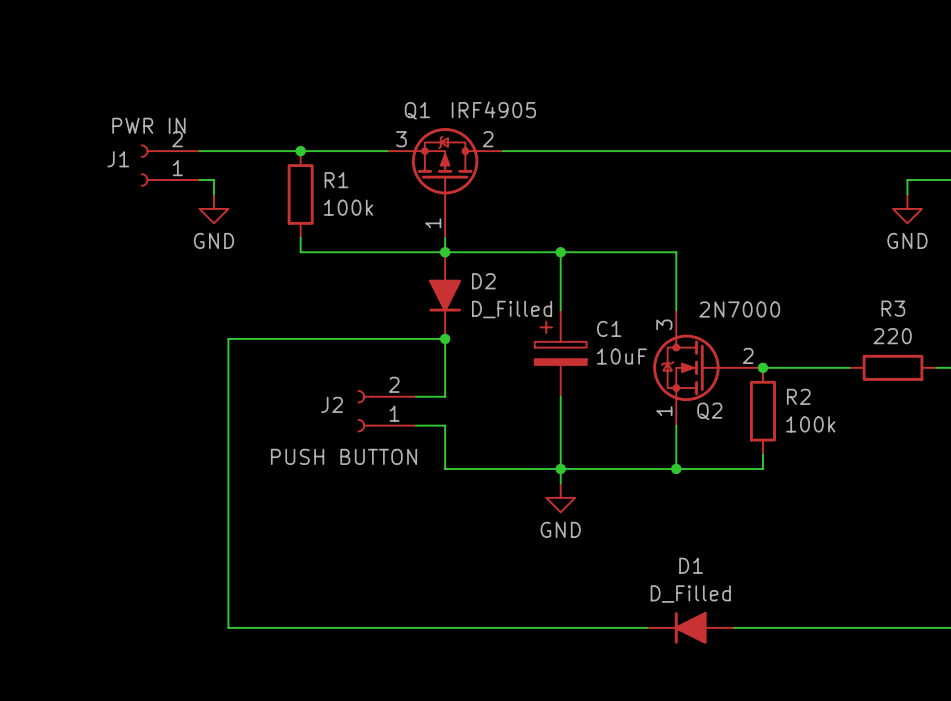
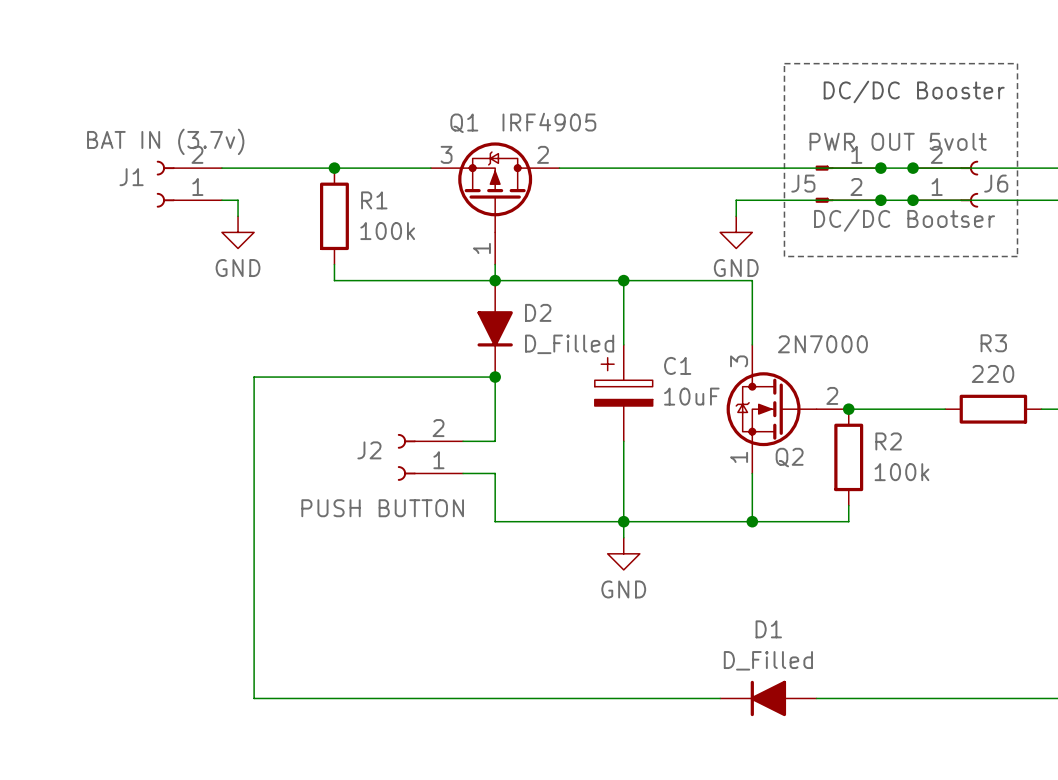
line: none -> (784, 63) (1017, 63) (1017, 256) (784, 256) (784, 63)
text: none -> DC/DC Booster (914, 91)
J1 value: PWR IN (148, 125) -> BAT IN (3.7v) (165, 141)
junction: none -> (880, 168)
junction: none -> (913, 168)
J5: none -> DC/DC Bootser (848, 184)
J6: none -> PWR OUT 5volt (945, 184)
junction: none -> (880, 200)
junction: none -> (913, 200)
wire: (907, 180) (907, 194) -> (1009, 200) (736, 200) (736, 216)
power symbol position: GND (907, 208) -> GND (736, 232)

